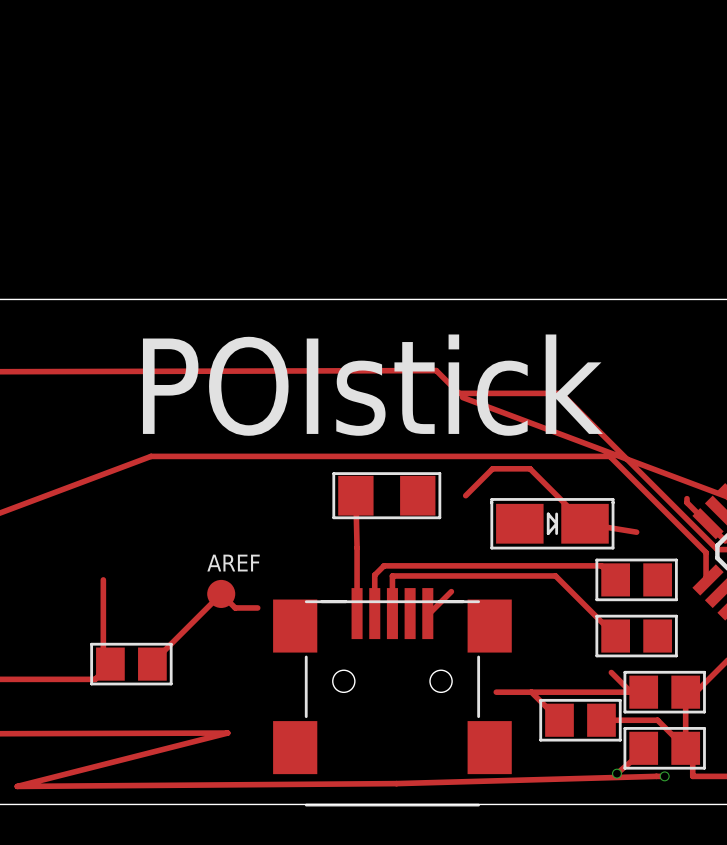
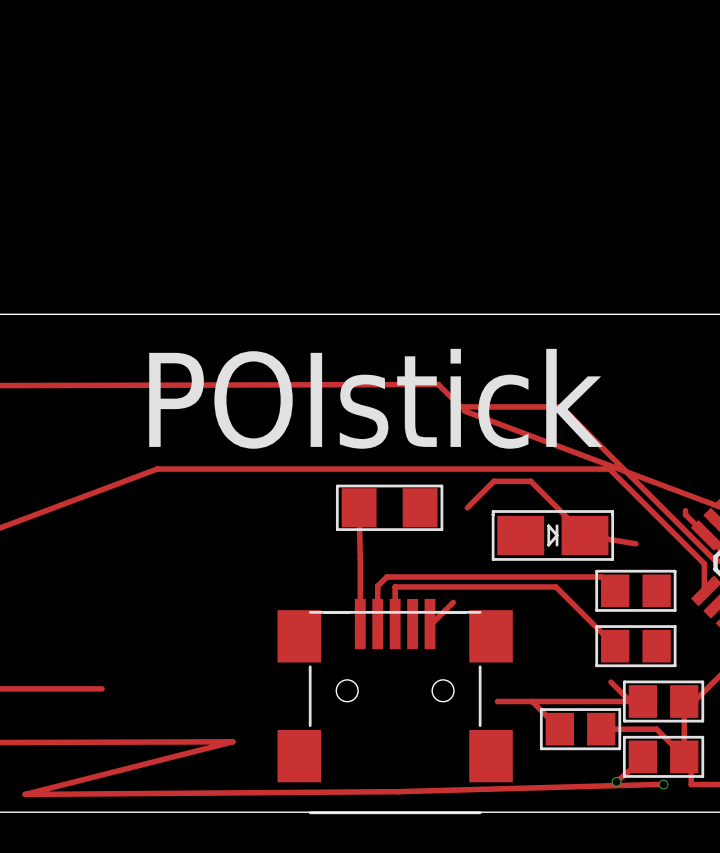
track: (103, 579) (103, 657) (110, 664) (95, 679) -> none
AREF: (221, 593) -> none
track: (257, 607) (235, 607) (221, 593) (152, 664) -> none
part: (131, 664) -> none

